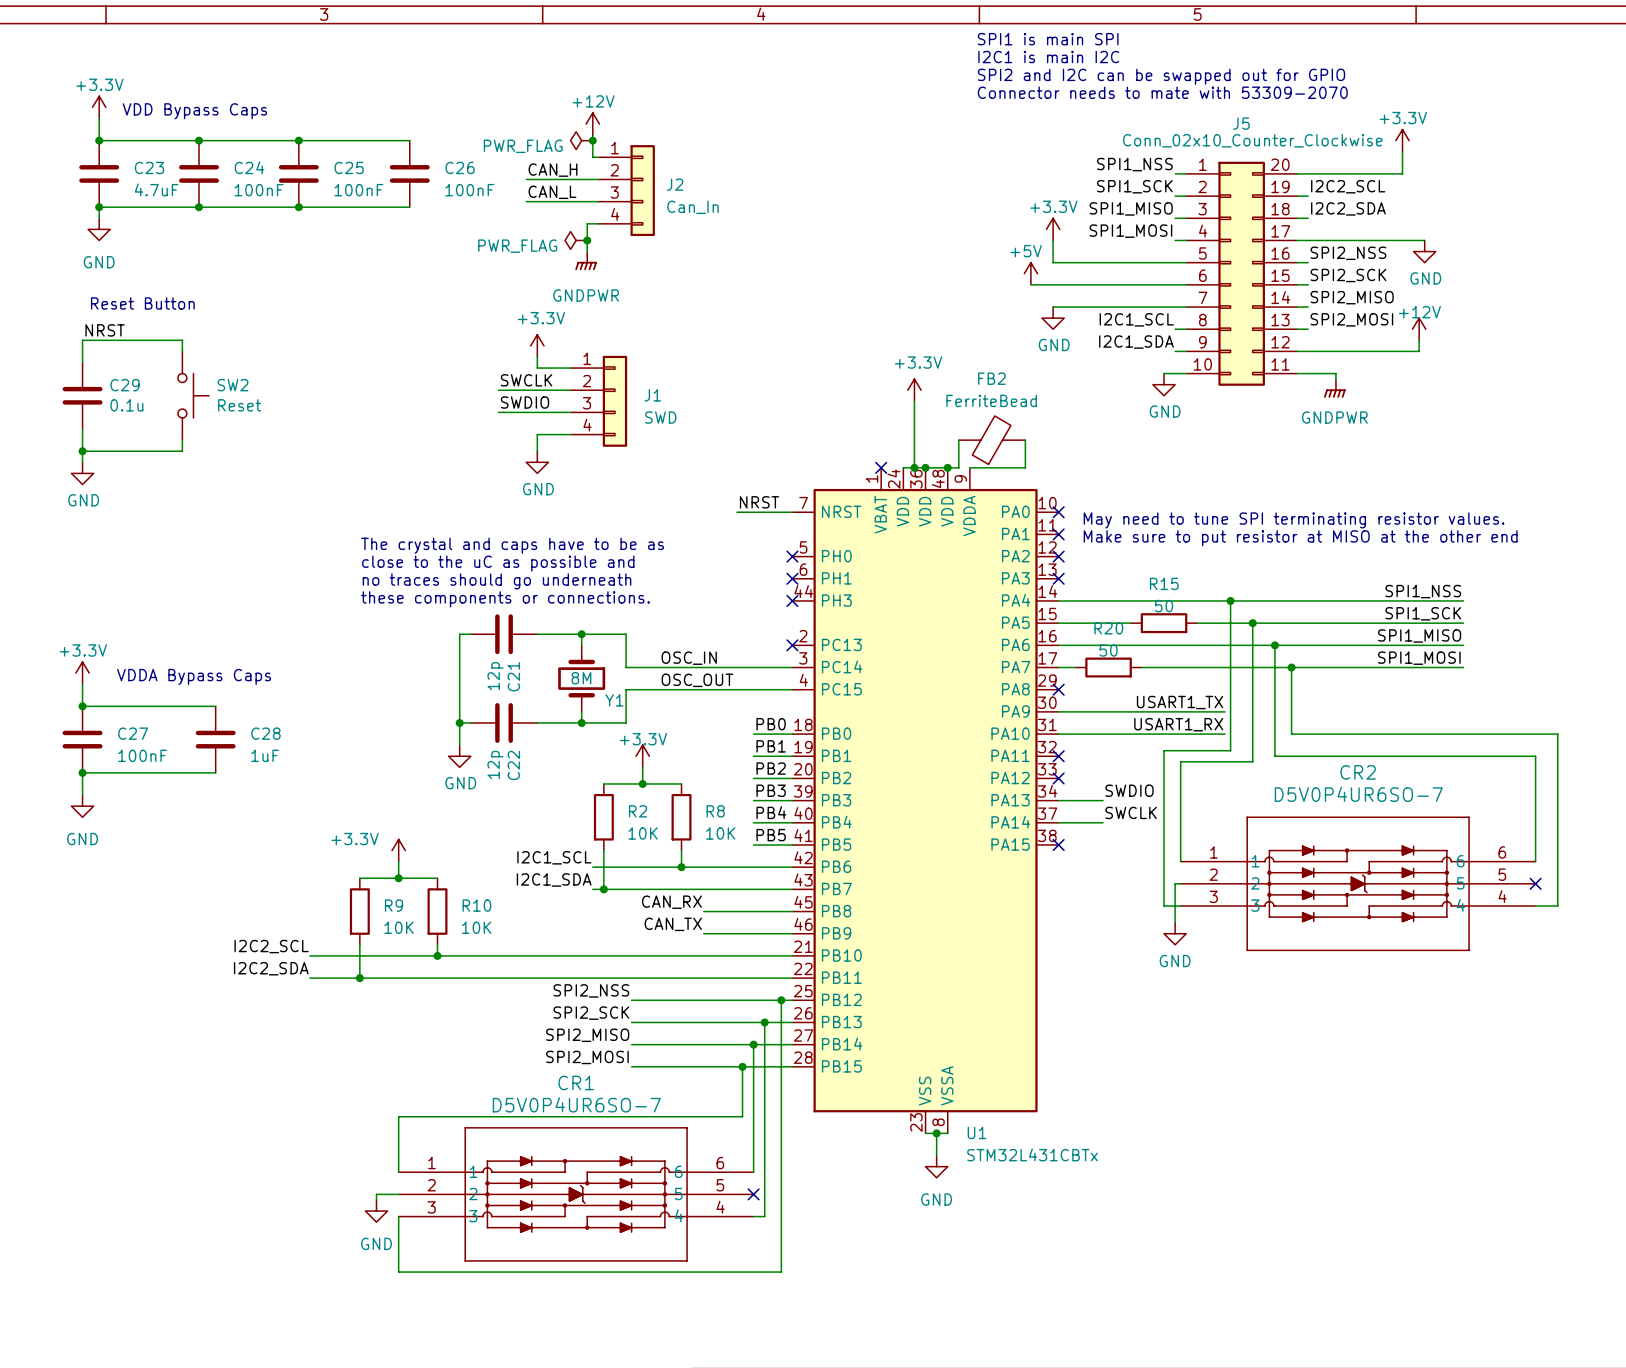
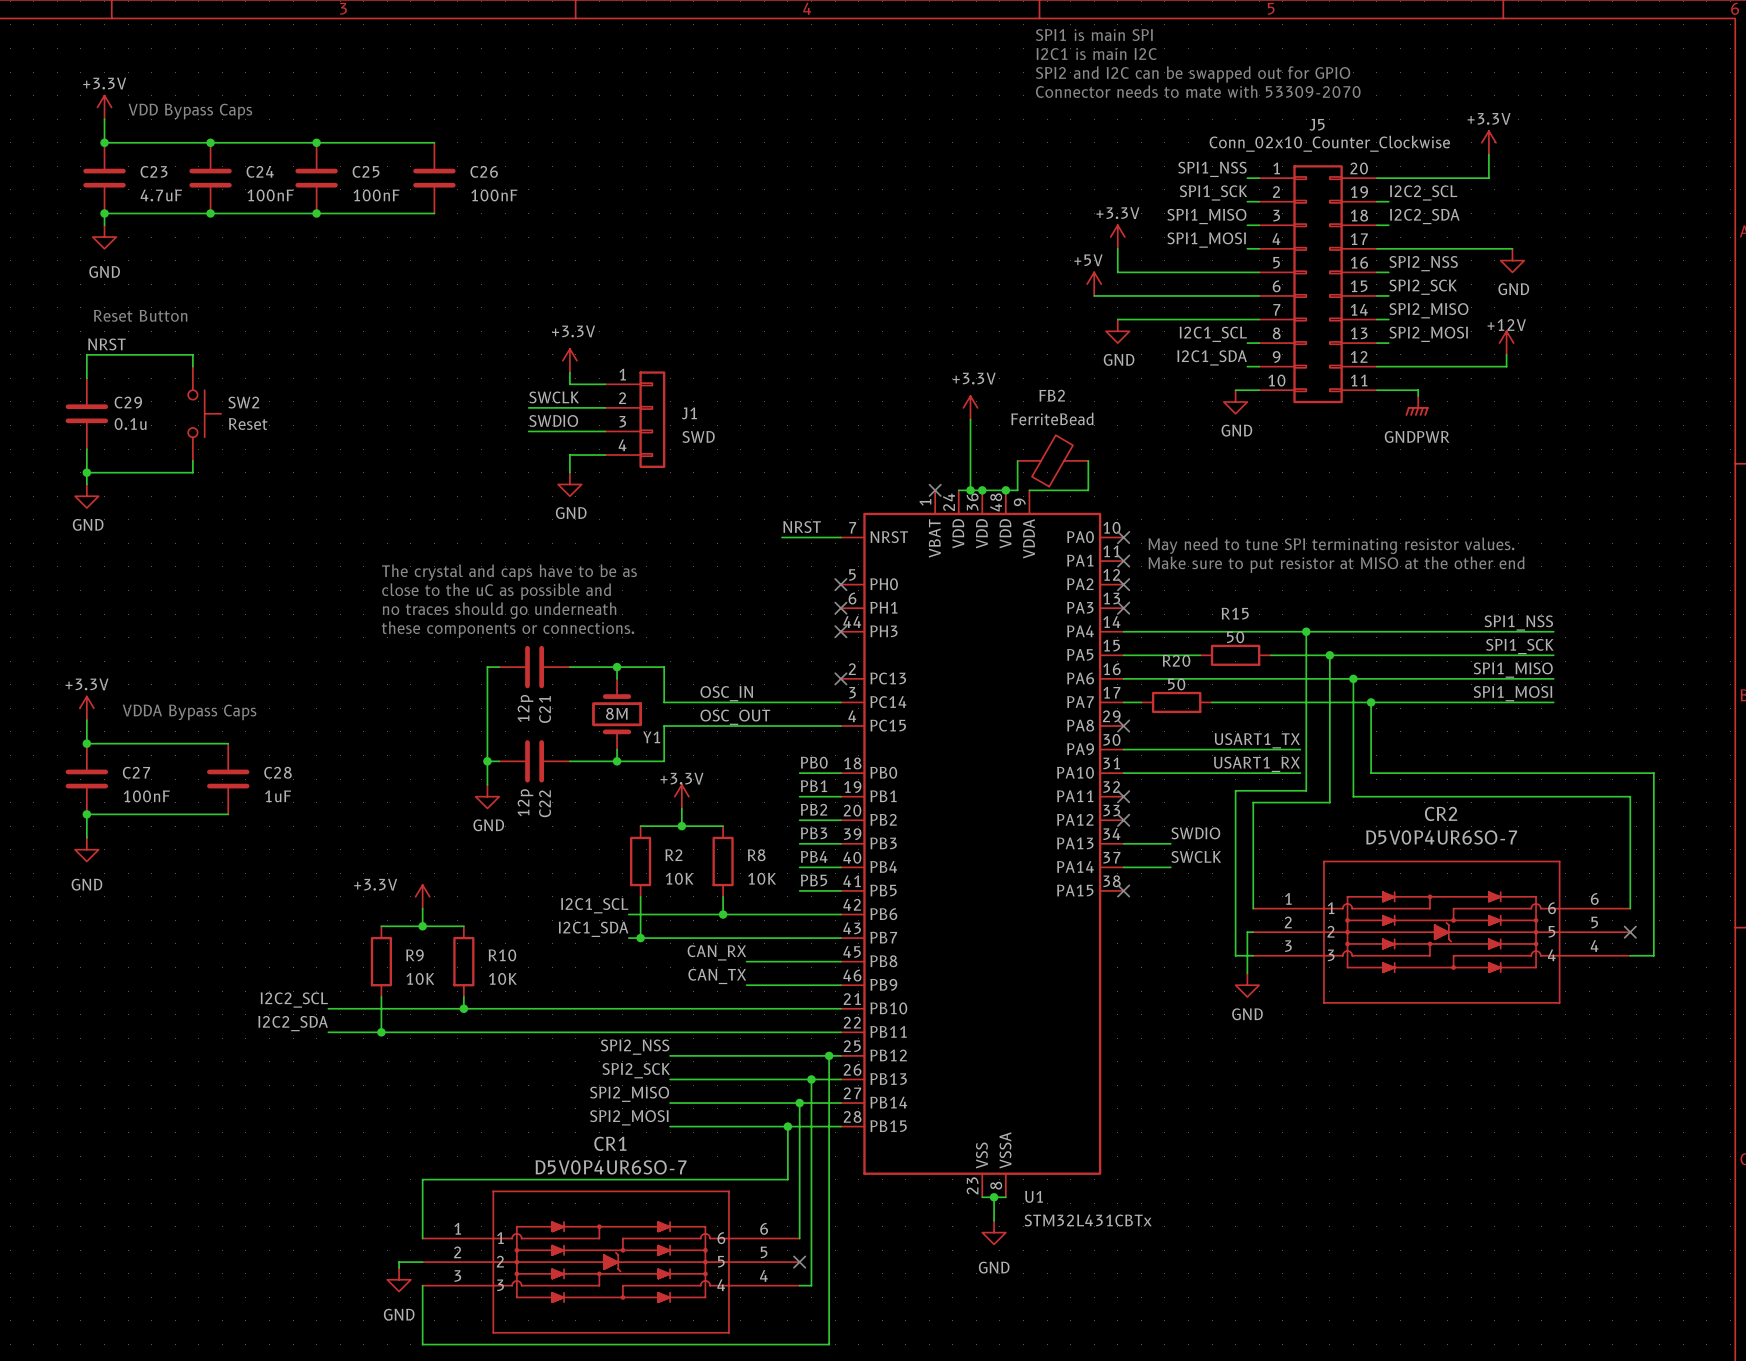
power symbol: +12V (592, 124) -> none
wire: (592, 135) (592, 157) (598, 157) -> none
power symbol: PWR_FLAG (581, 140) -> none
junction: (592, 140) -> none
label: CAN_H (552, 170) -> none
wire: (526, 179) (598, 179) -> none
J2: Can_In (626, 190) -> none
label: CAN_L (552, 192) -> none
wire: (526, 201) (598, 201) -> none
wire: (598, 223) (587, 223) (587, 251) -> none
power symbol: PWR_FLAG (576, 240) -> none
junction: (587, 240) -> none
power symbol: GNDPWR (586, 260) -> none

